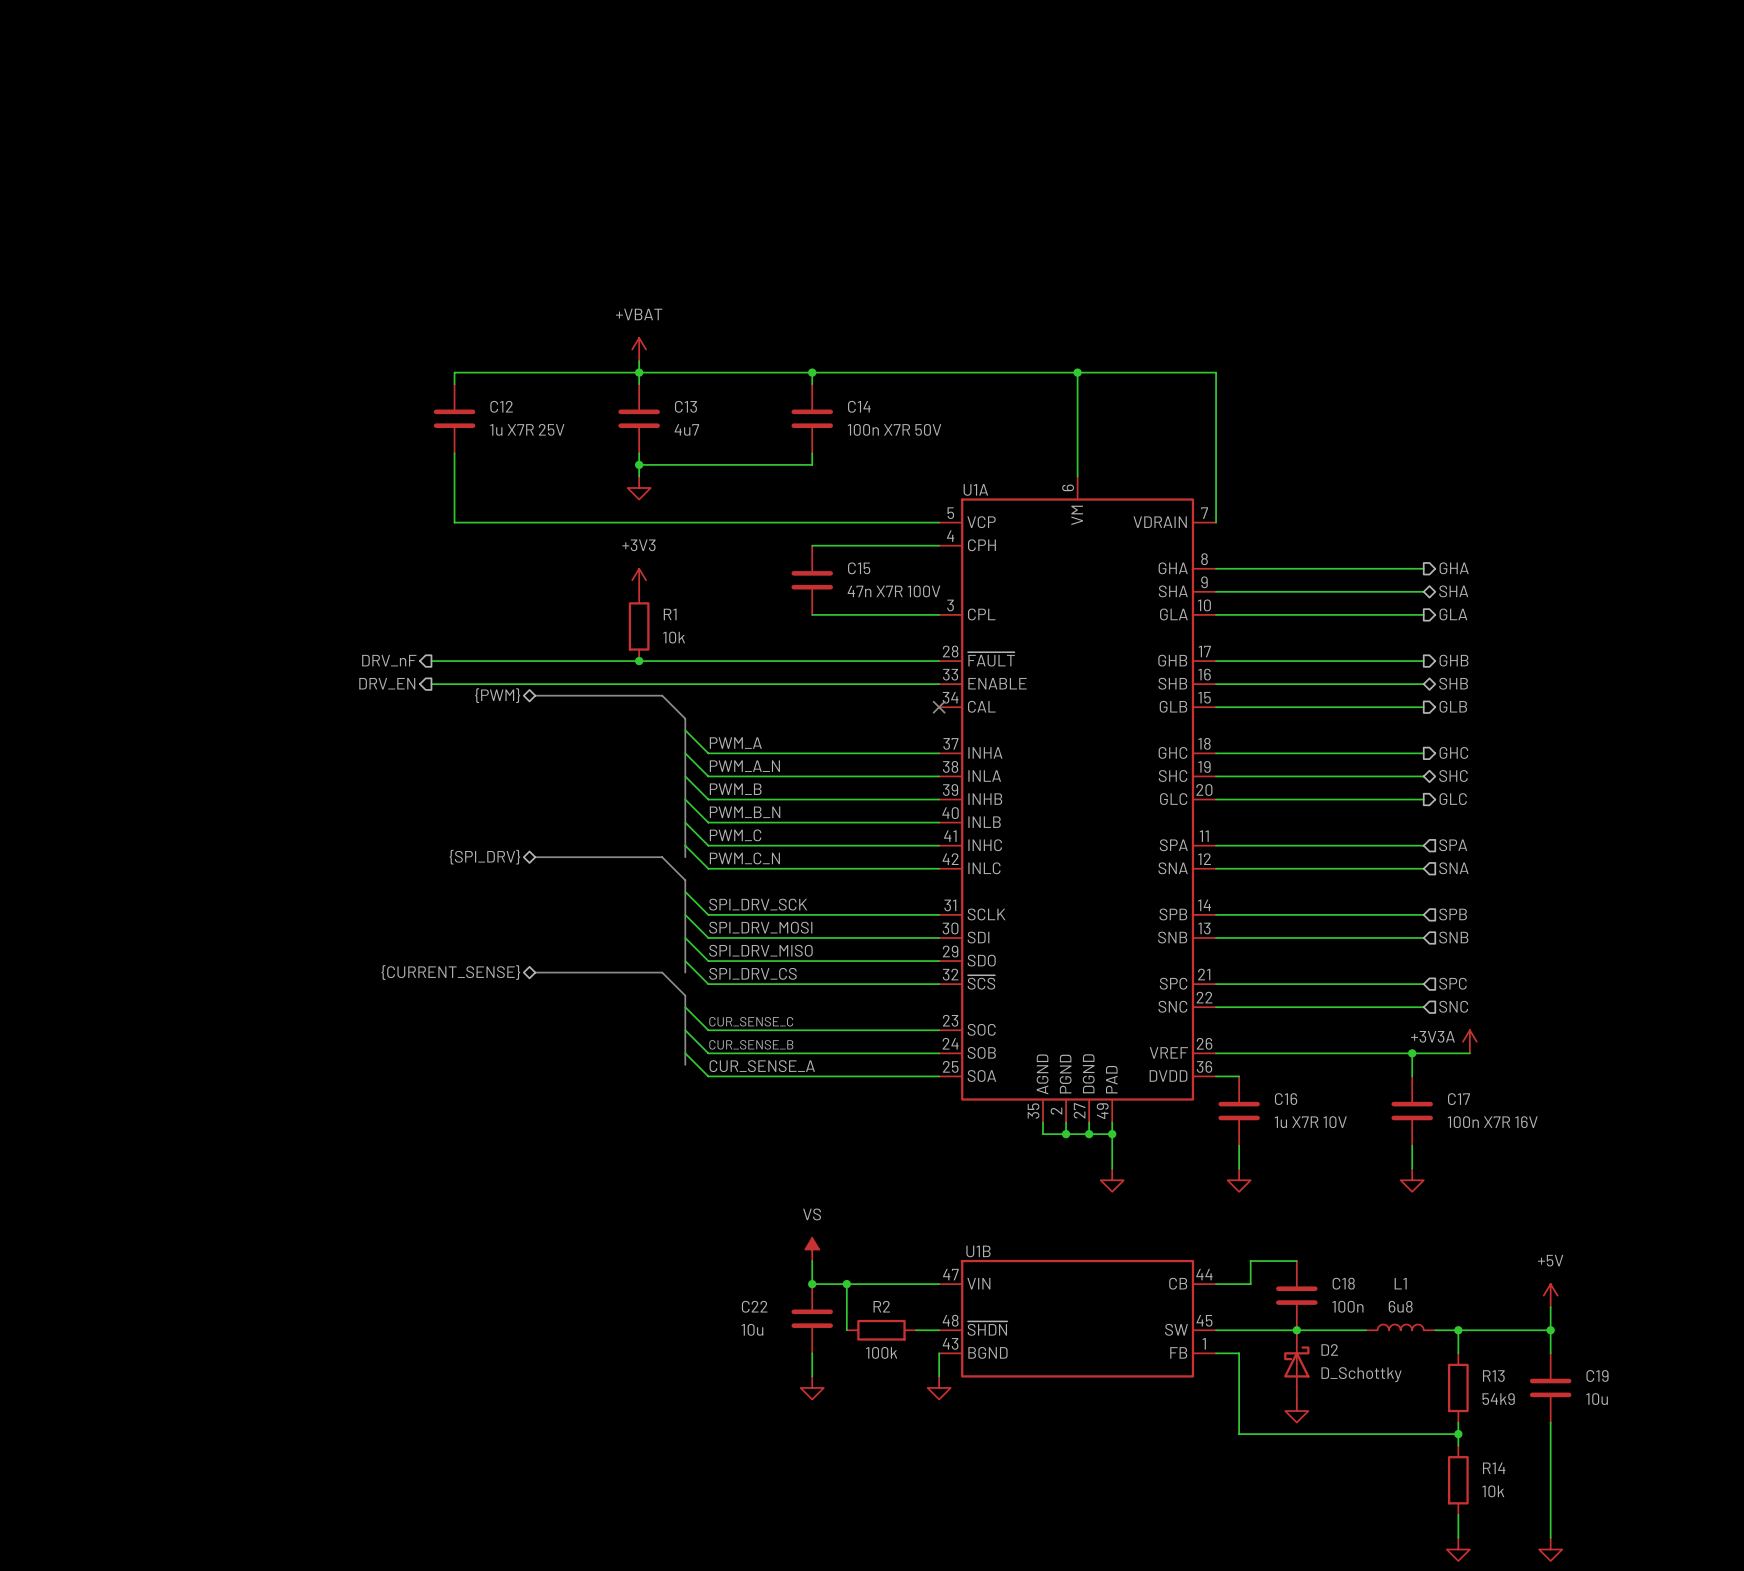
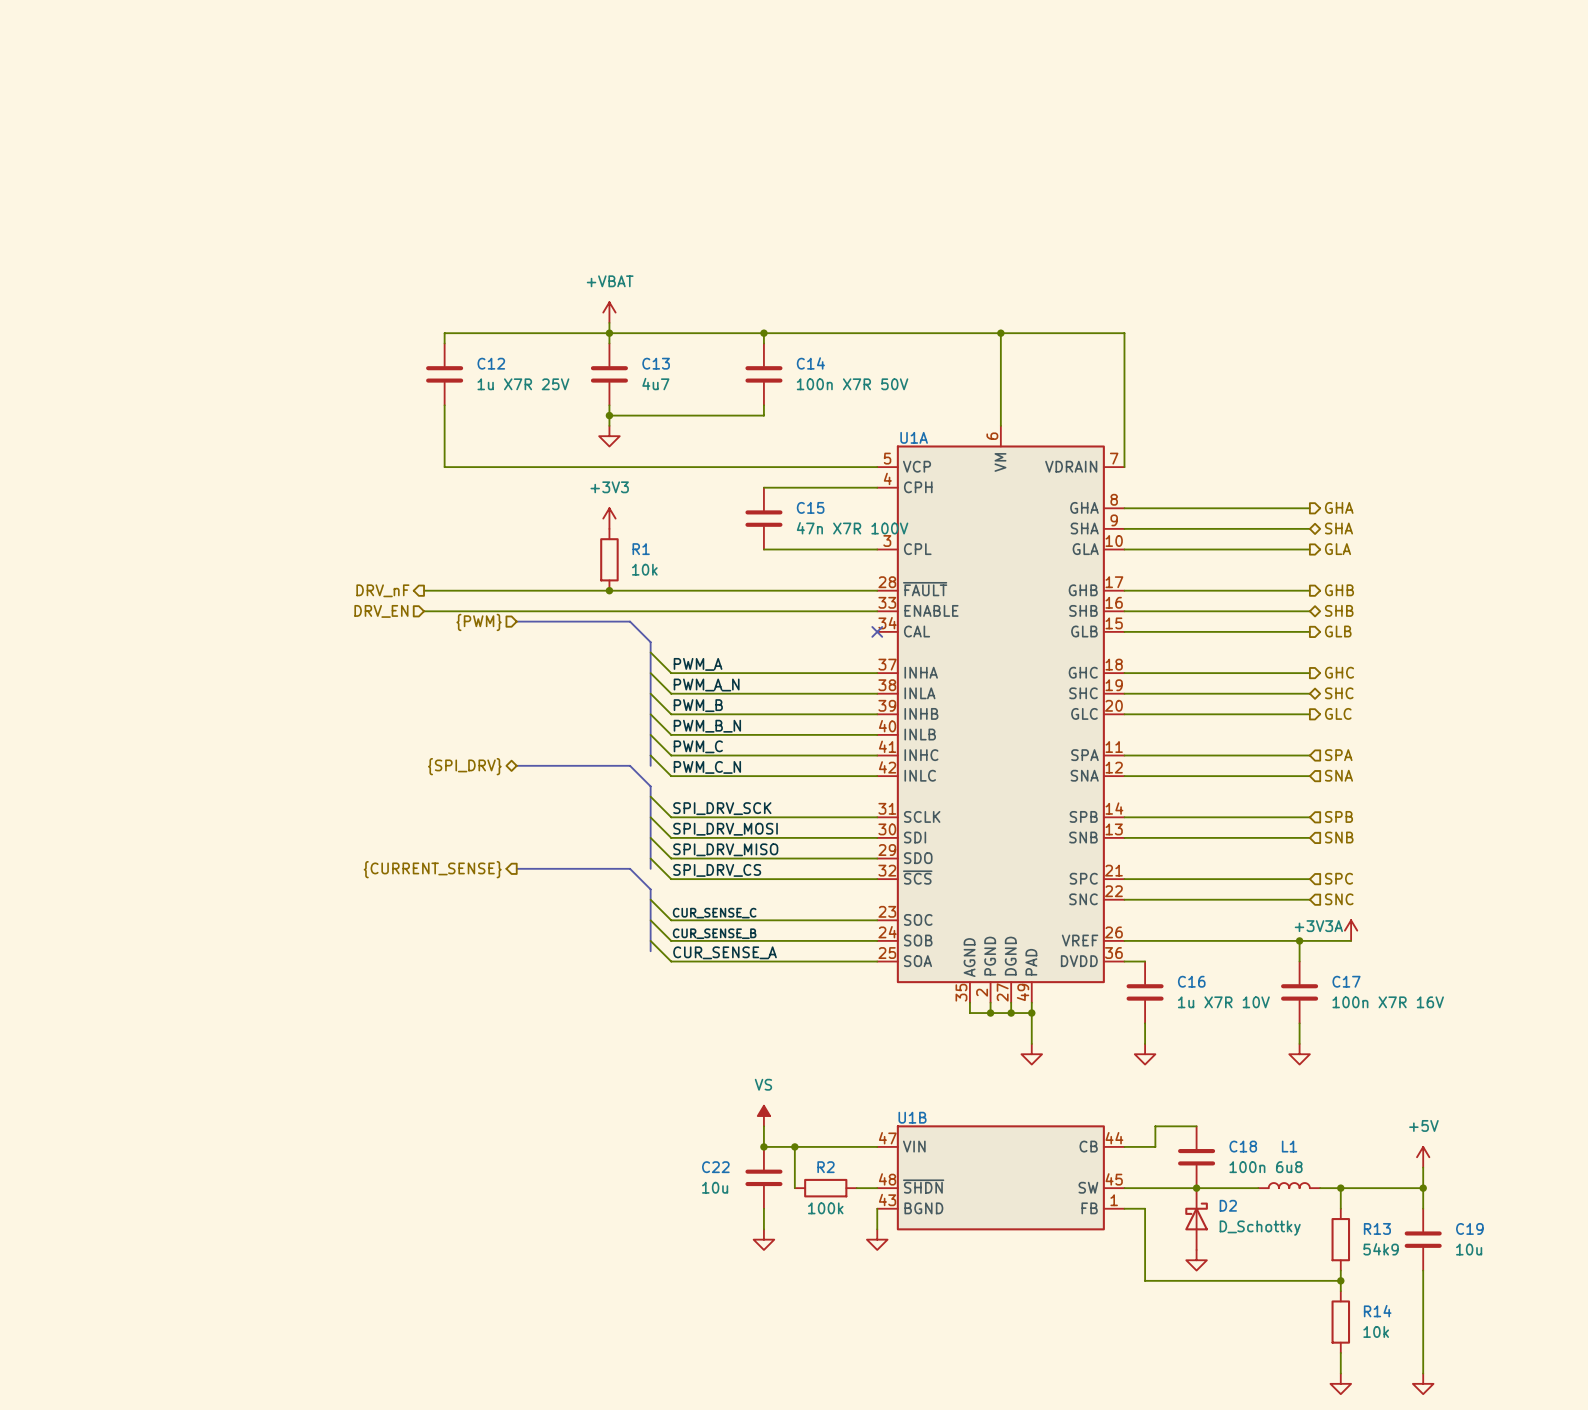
hierarchical label shape: output (387, 683) -> input (381, 611)
hierarchical label shape: bidirectional (497, 695) -> input (479, 622)
hierarchical label shape: bidirectional (450, 972) -> output (432, 869)

